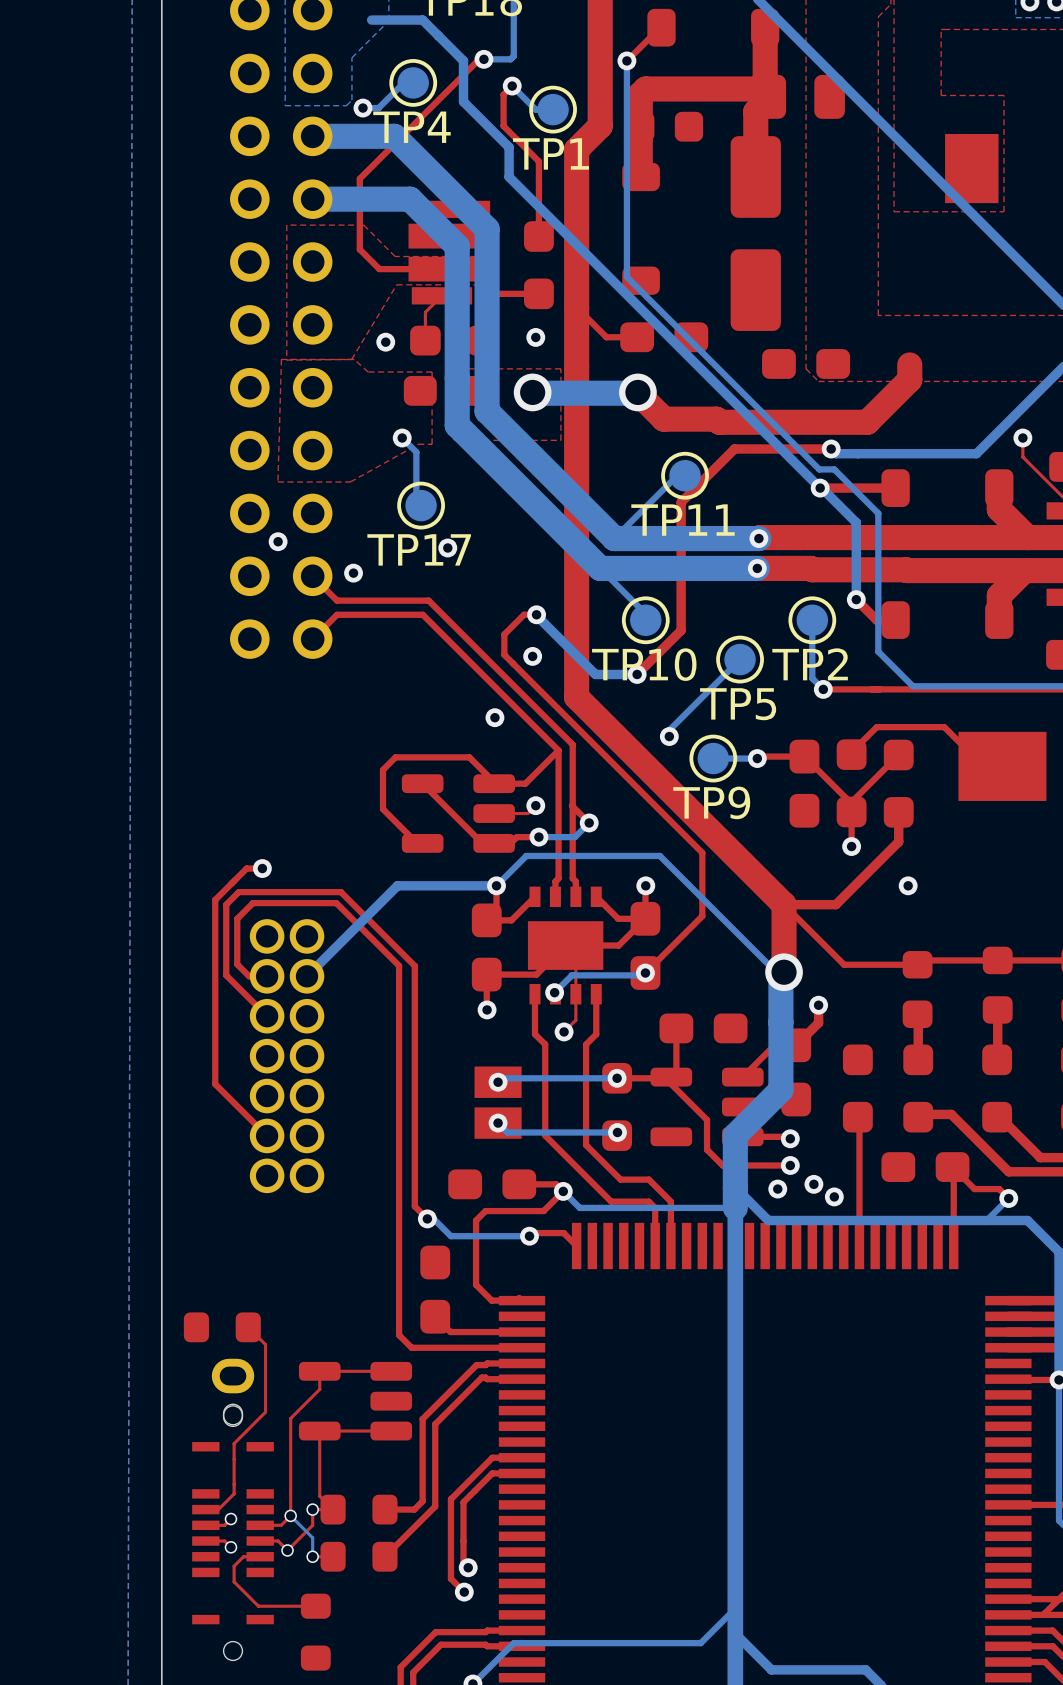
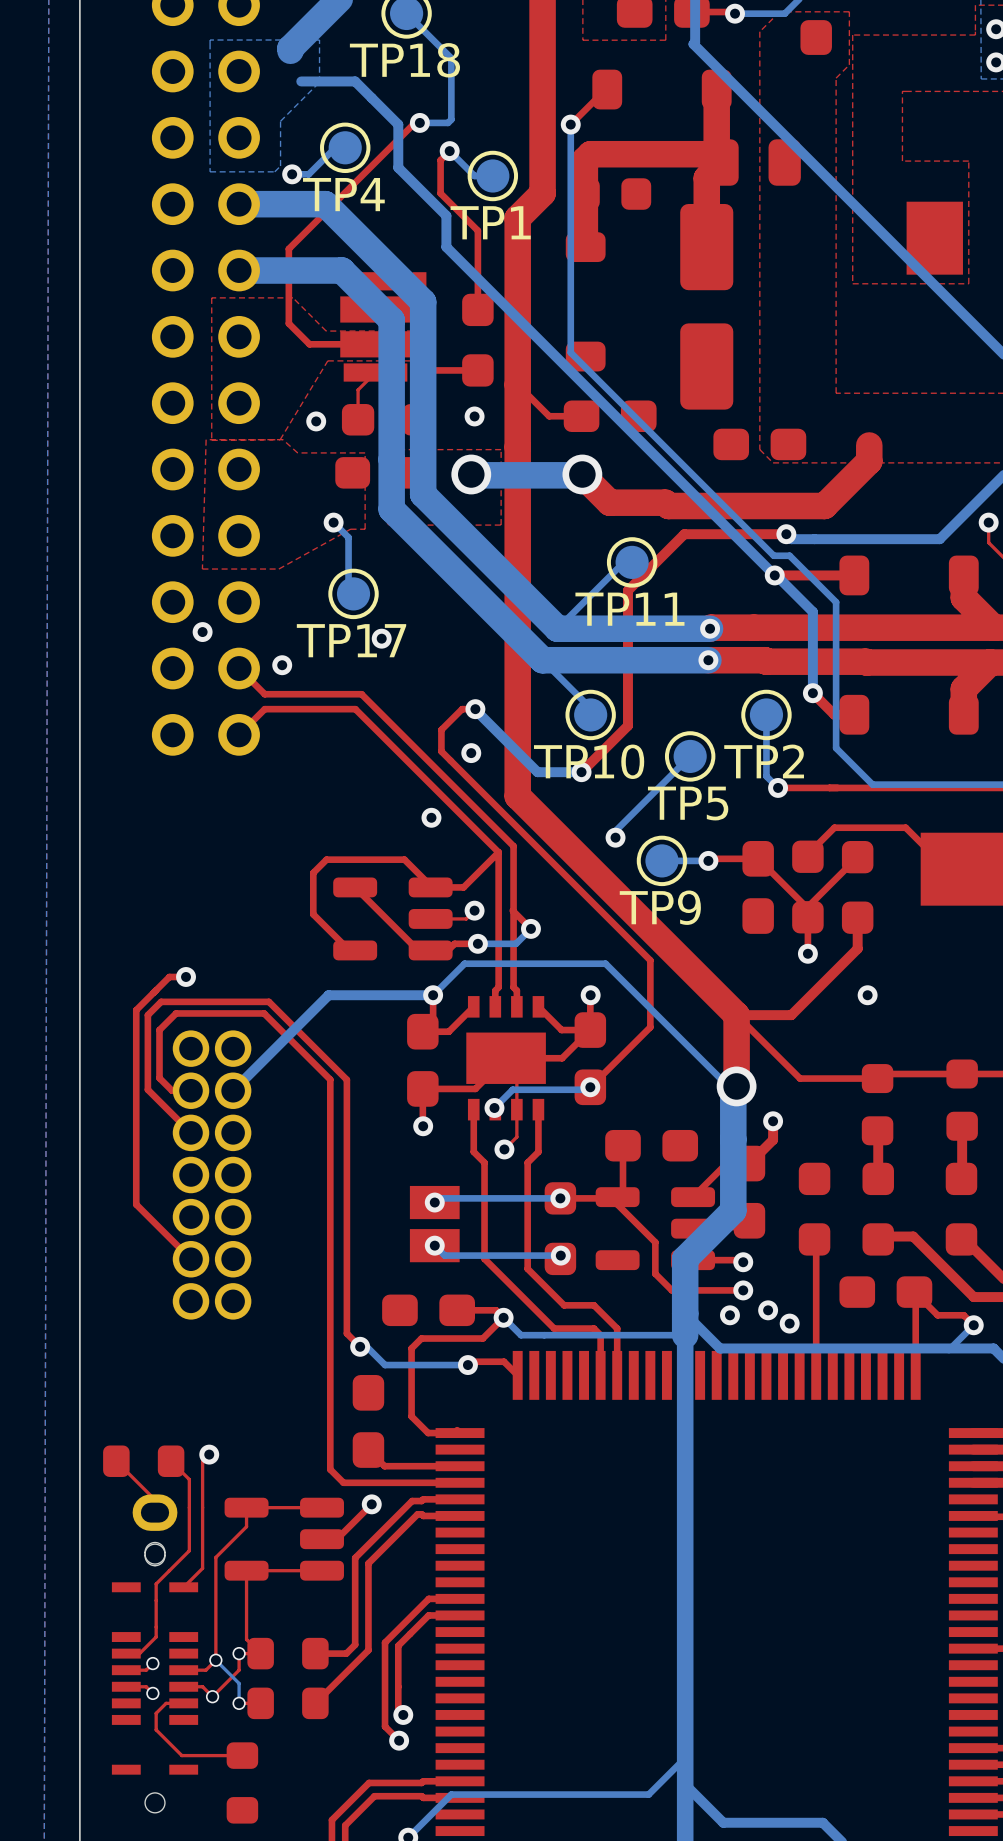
top track: none -> (209, 1454) (202, 1461) (202, 1568) (183, 1587)
via: none -> (209, 1454)
top track: none -> (116, 1461) (155, 1499) (155, 1512)
top track: none -> (371, 1504) (336, 1539) (322, 1539)
via: none -> (371, 1504)

